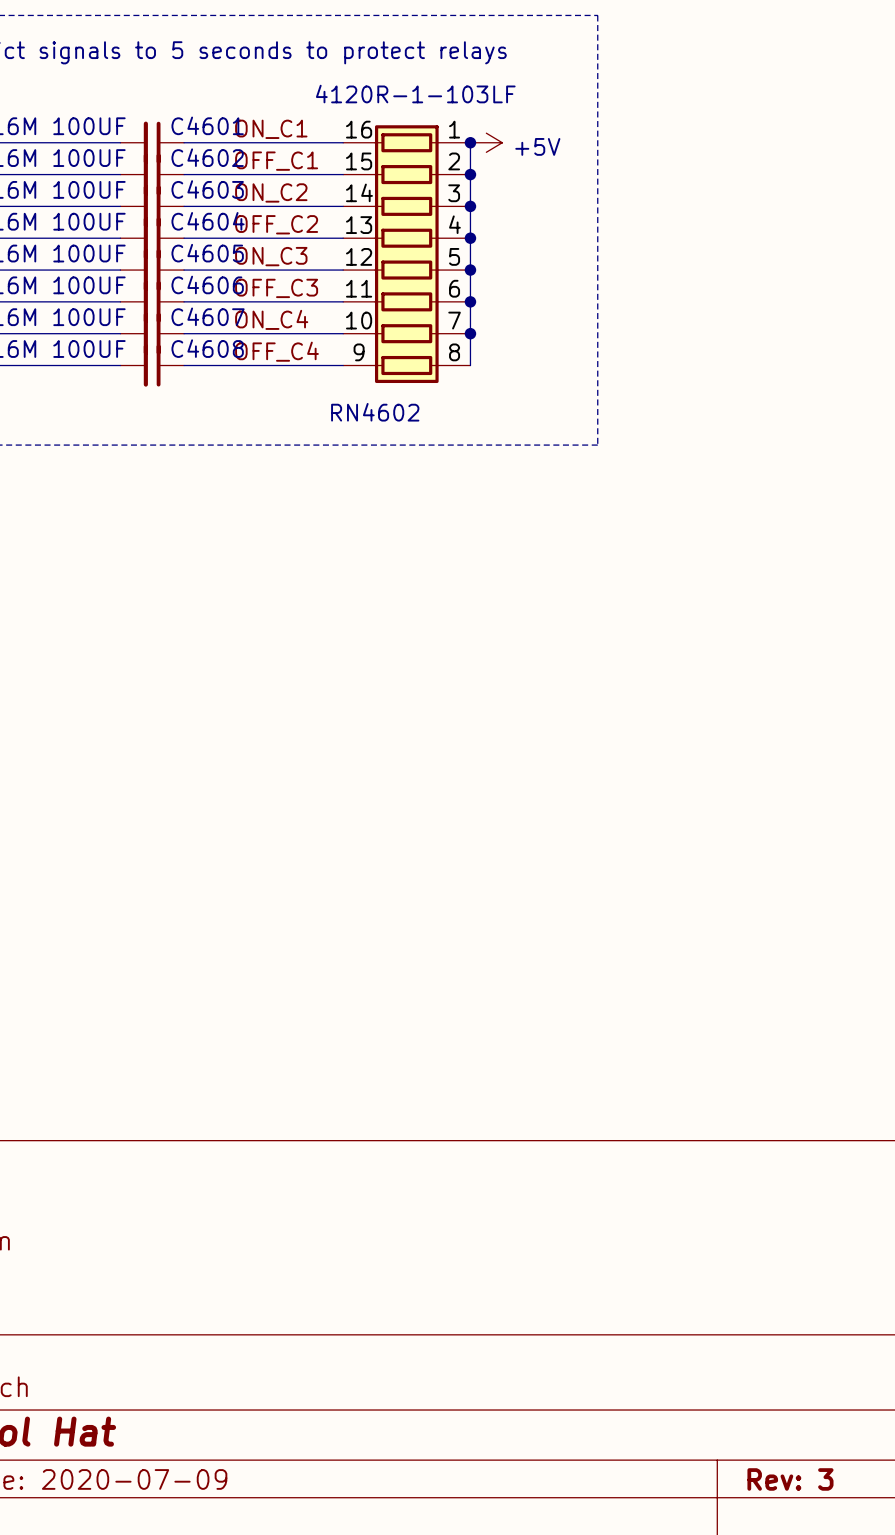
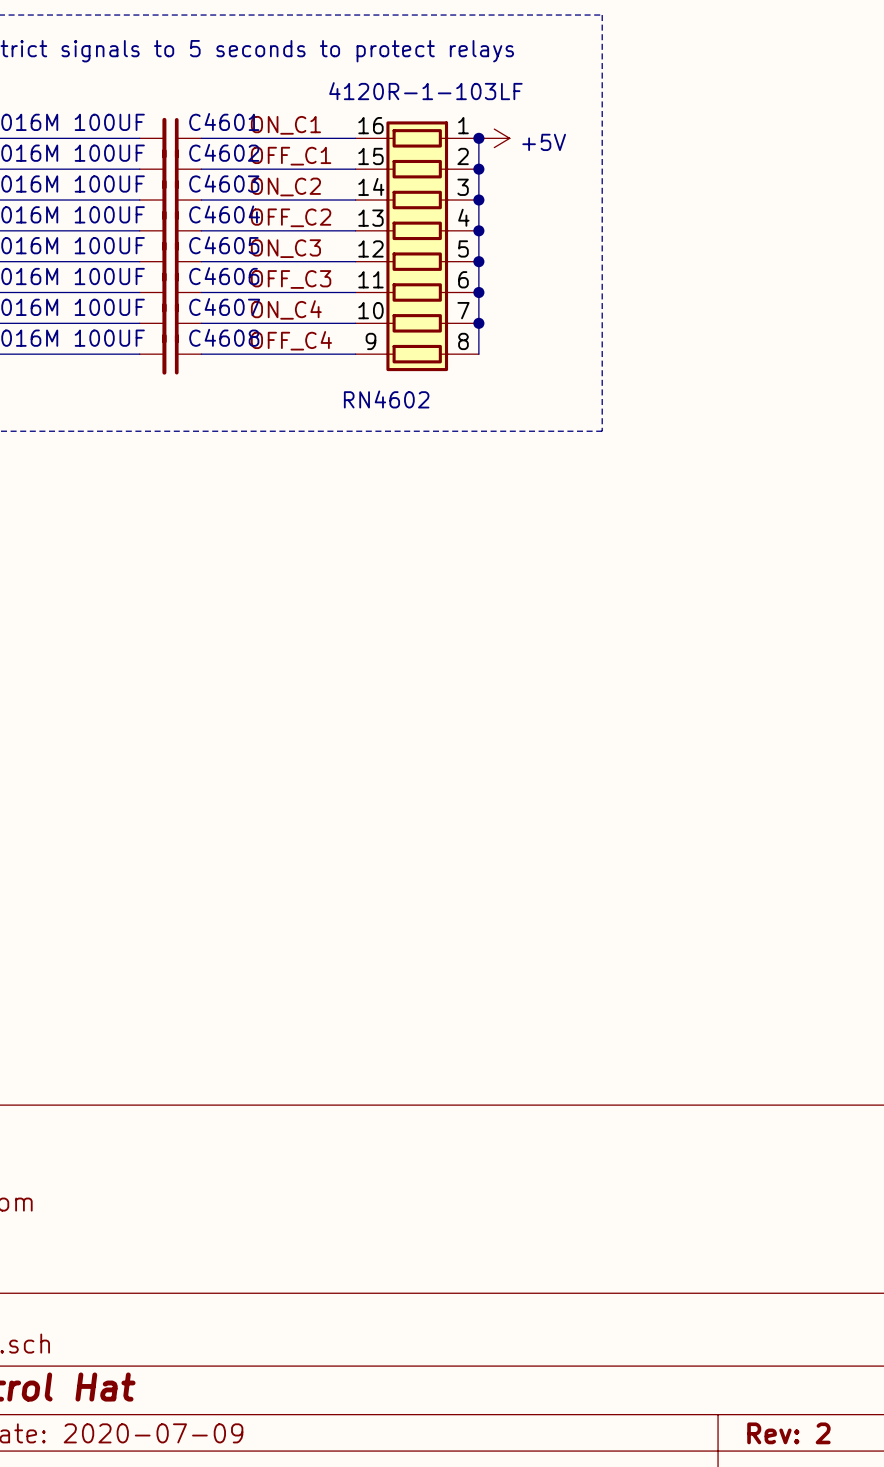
title block: Rev: 3 (790, 1479) -> Rev: 2 (788, 1433)

